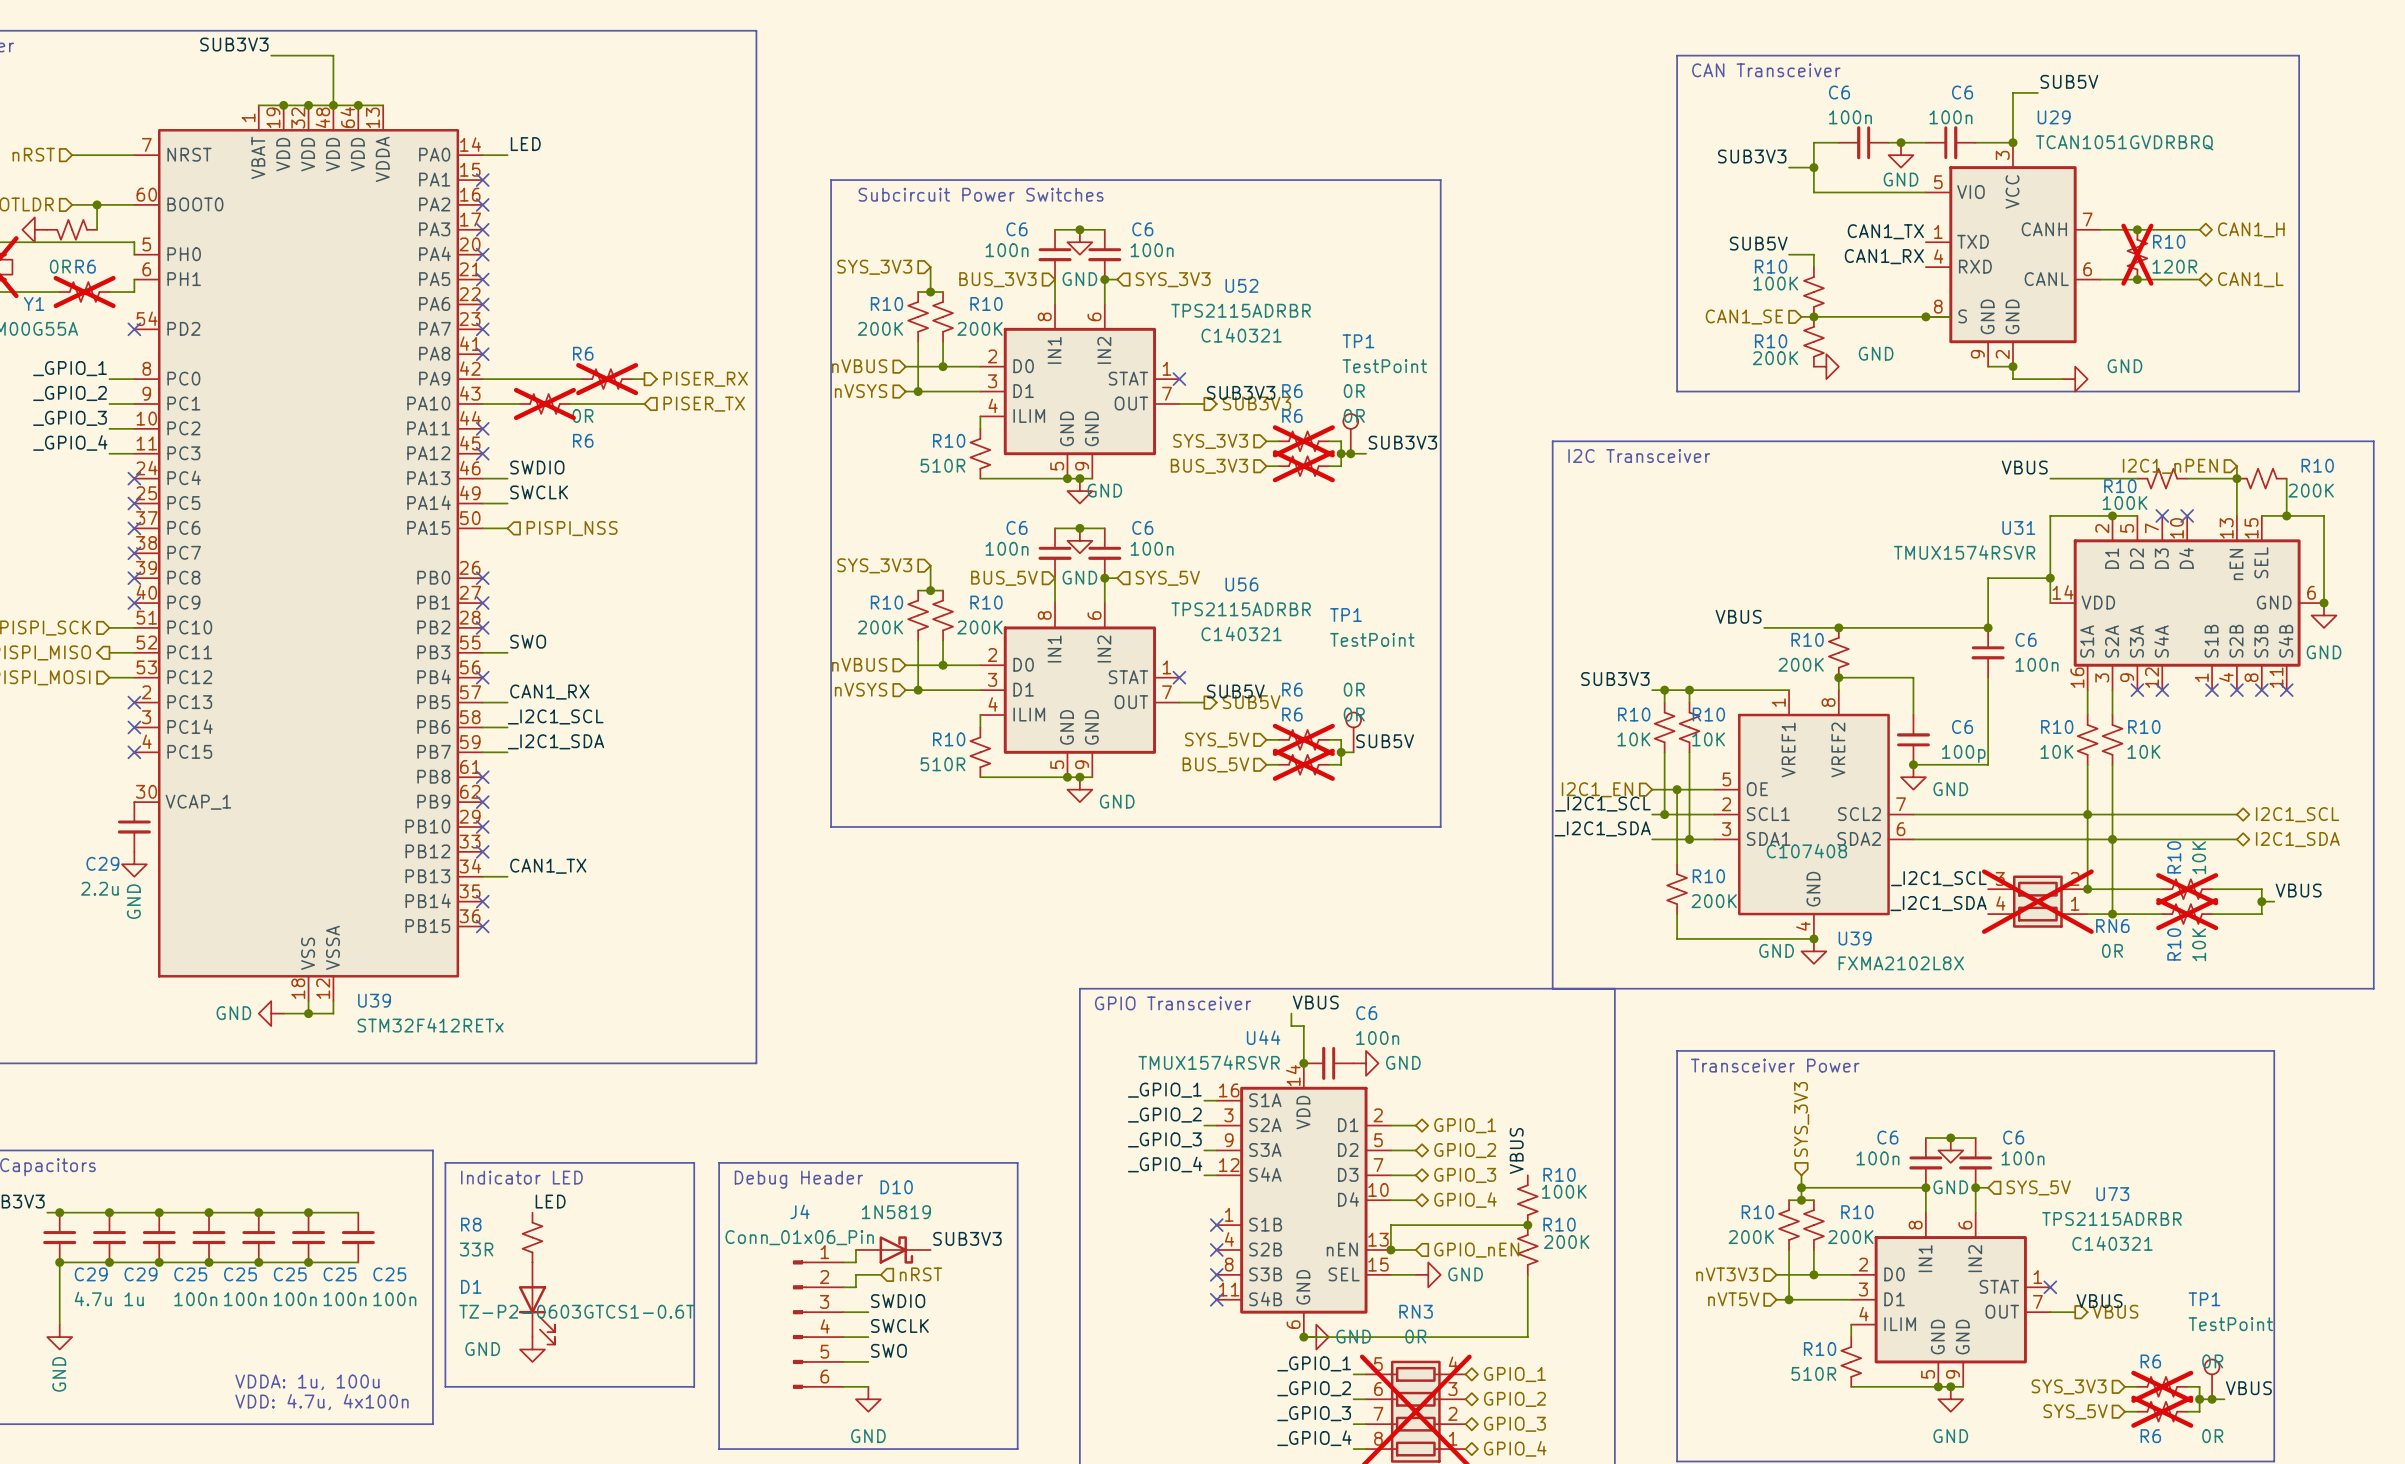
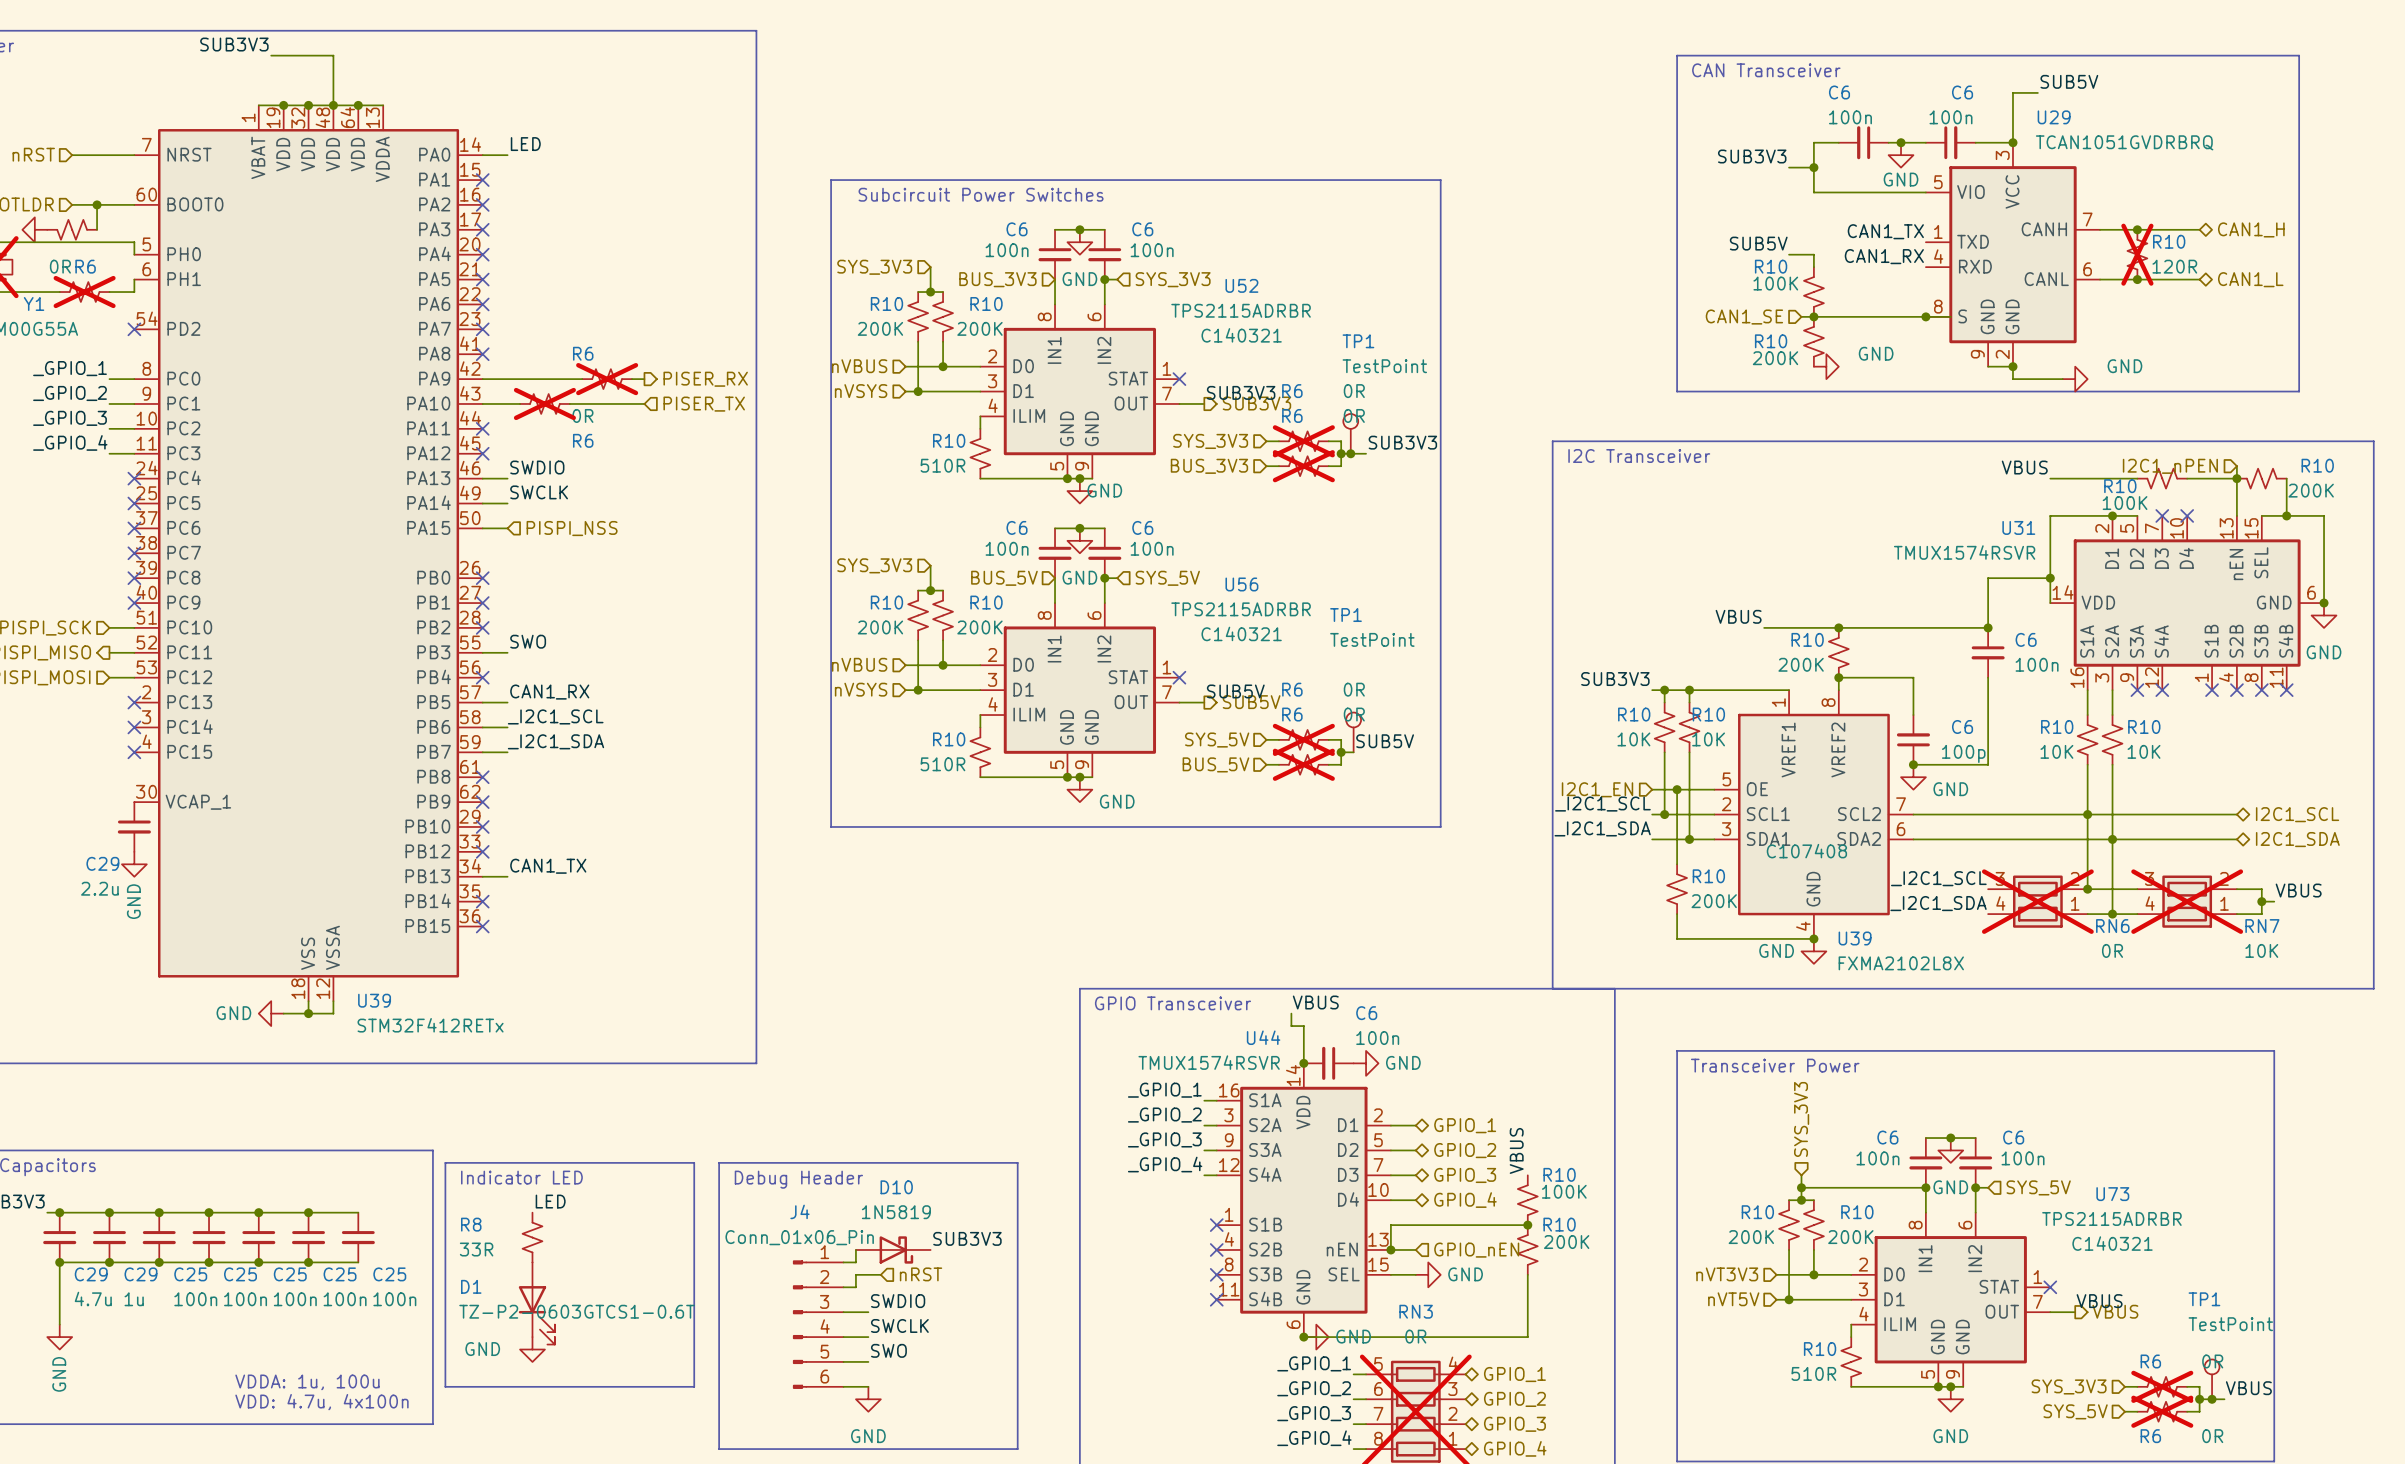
R10: 10K (2187, 889) -> none
RN7: none -> 10K (2187, 901)
R10: 10K (2187, 914) -> none

